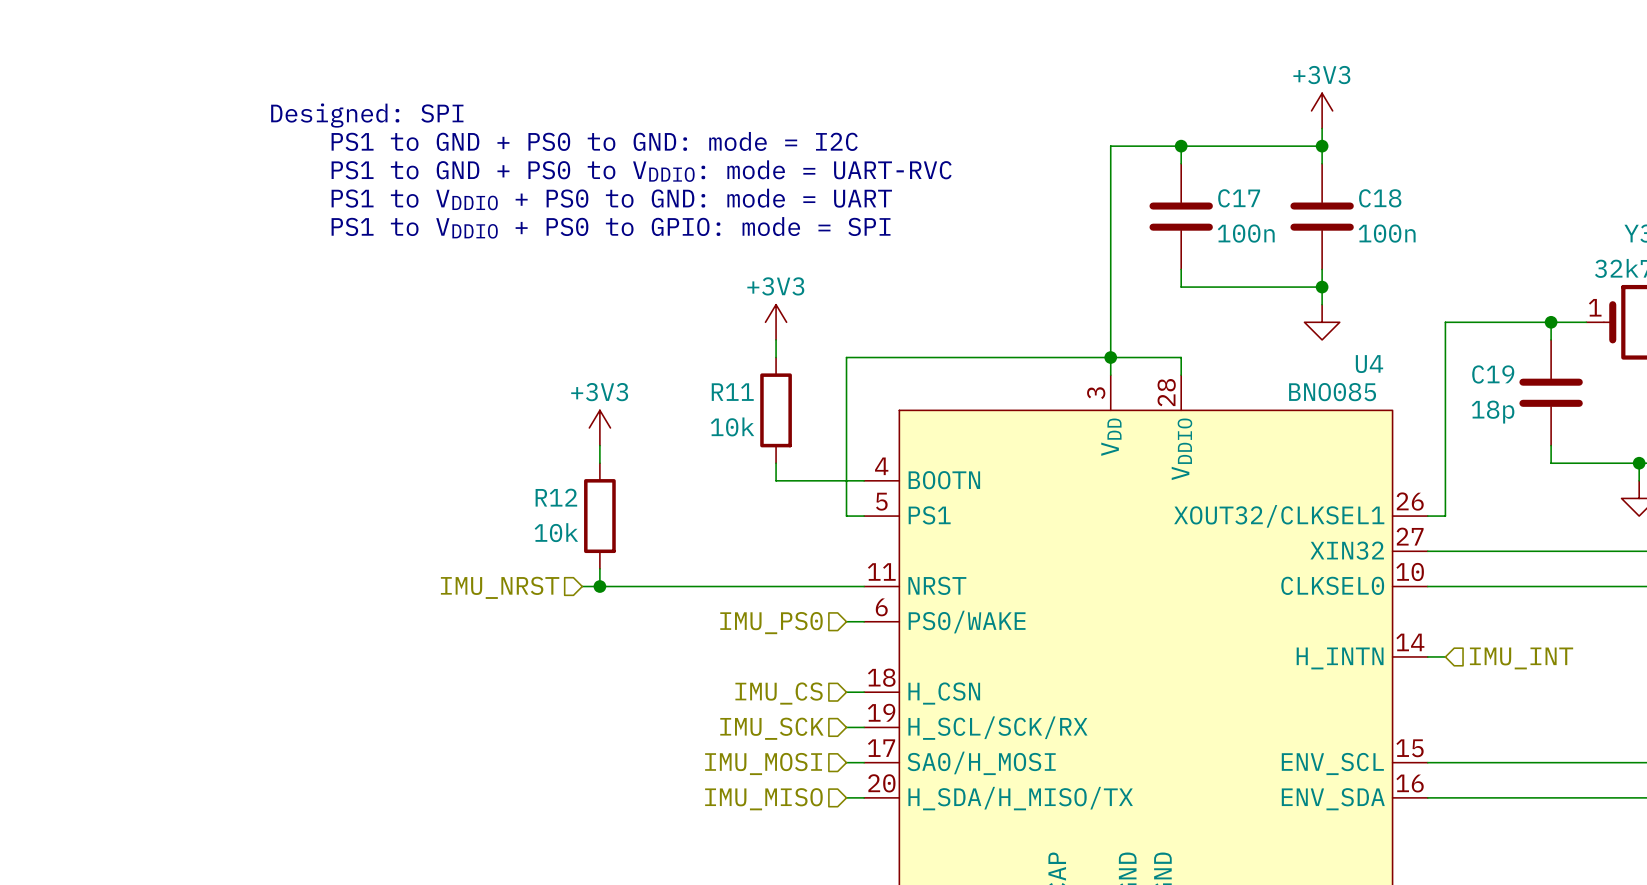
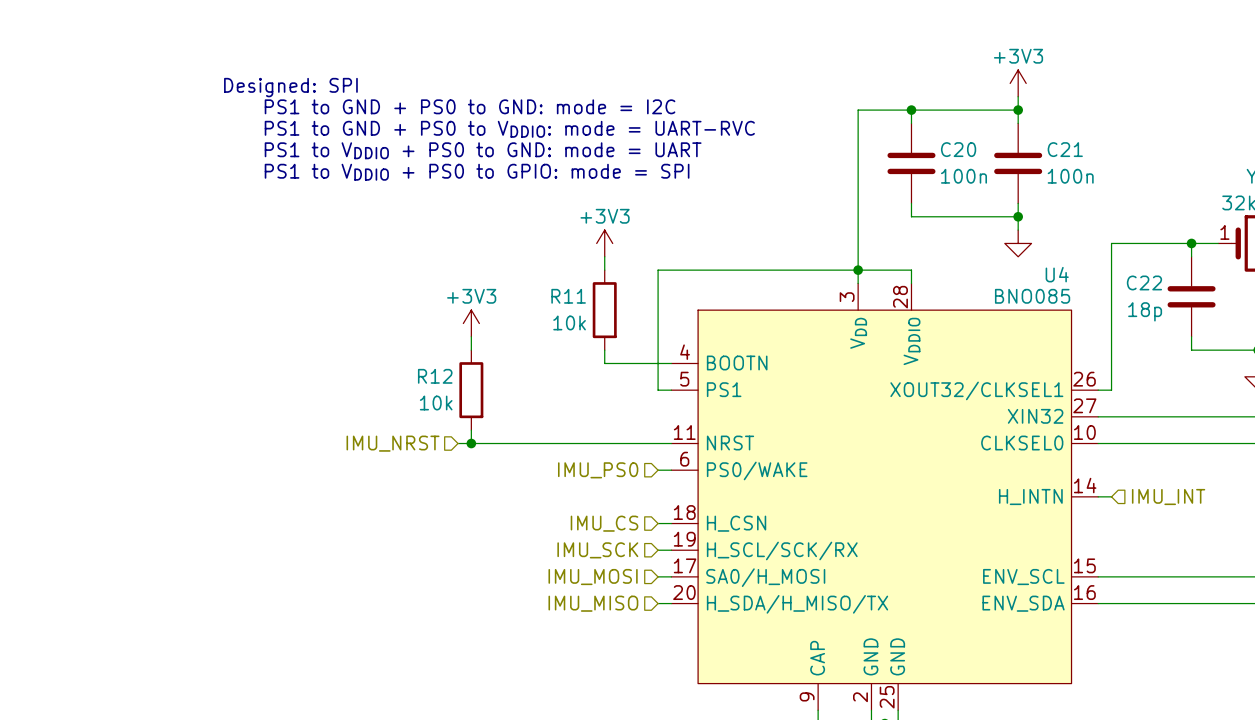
C17 name: C17 (1239, 198) -> C20 (958, 149)
C18 name: C18 (1380, 198) -> C21 (1065, 149)
C19 name: C19 (1493, 374) -> C22 (1144, 282)

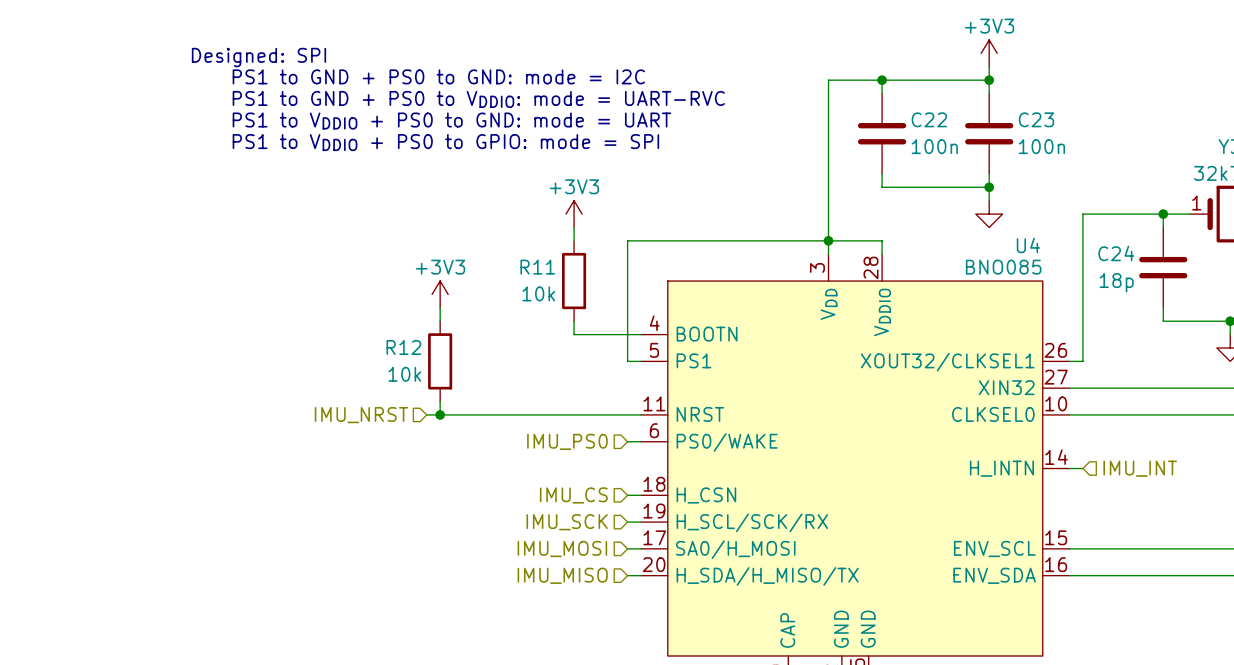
C20 name: C20 (958, 149) -> C22 (929, 119)
C21 name: C21 (1065, 149) -> C23 (1036, 119)
C22 name: C22 (1144, 282) -> C24 (1116, 253)

